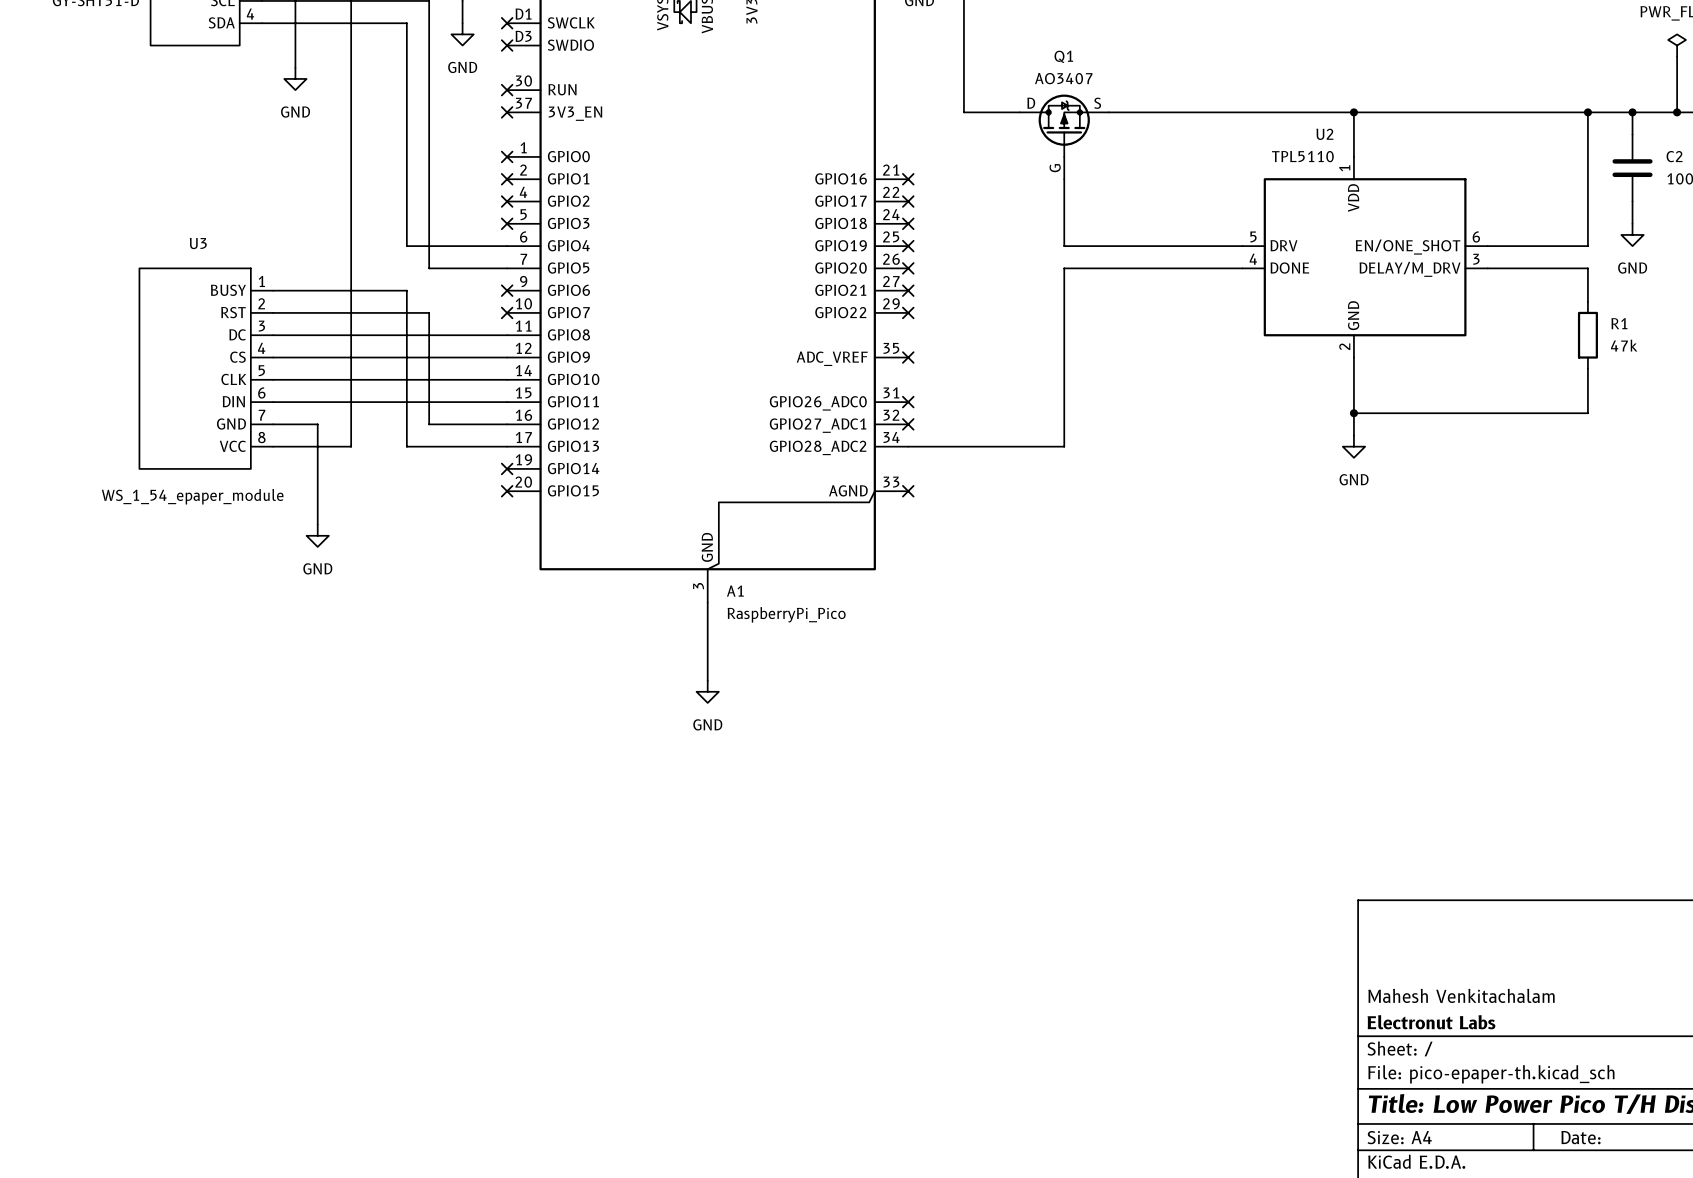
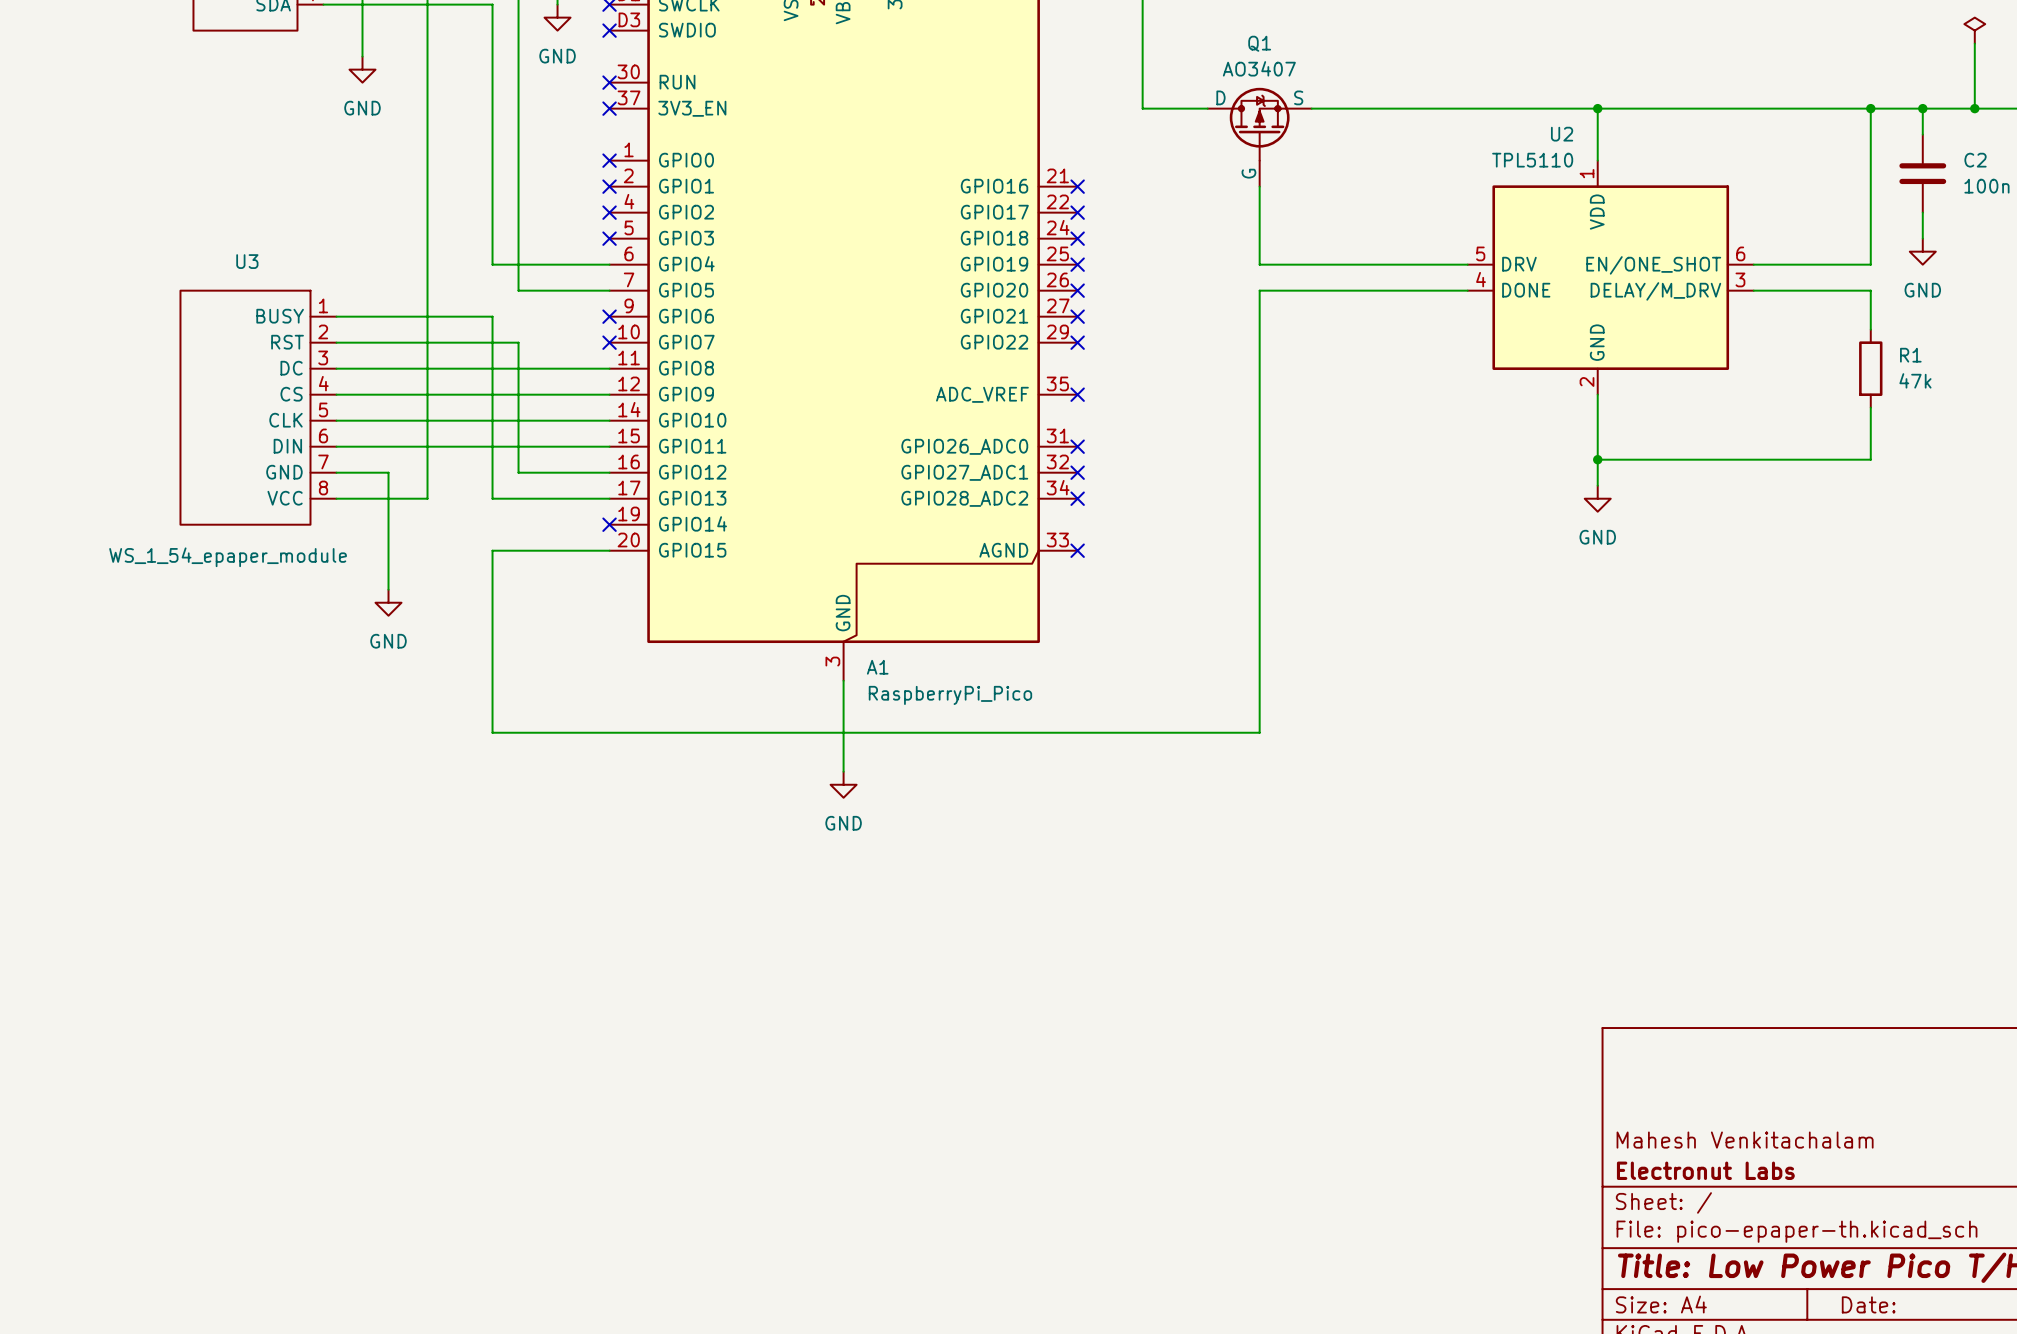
wire: (908, 446) (1064, 446) -> (609, 550) (492, 550) (492, 732) (1259, 732) (1259, 498)
no-connect mark: none -> (1077, 498)
no-connect mark: (507, 491) -> none

